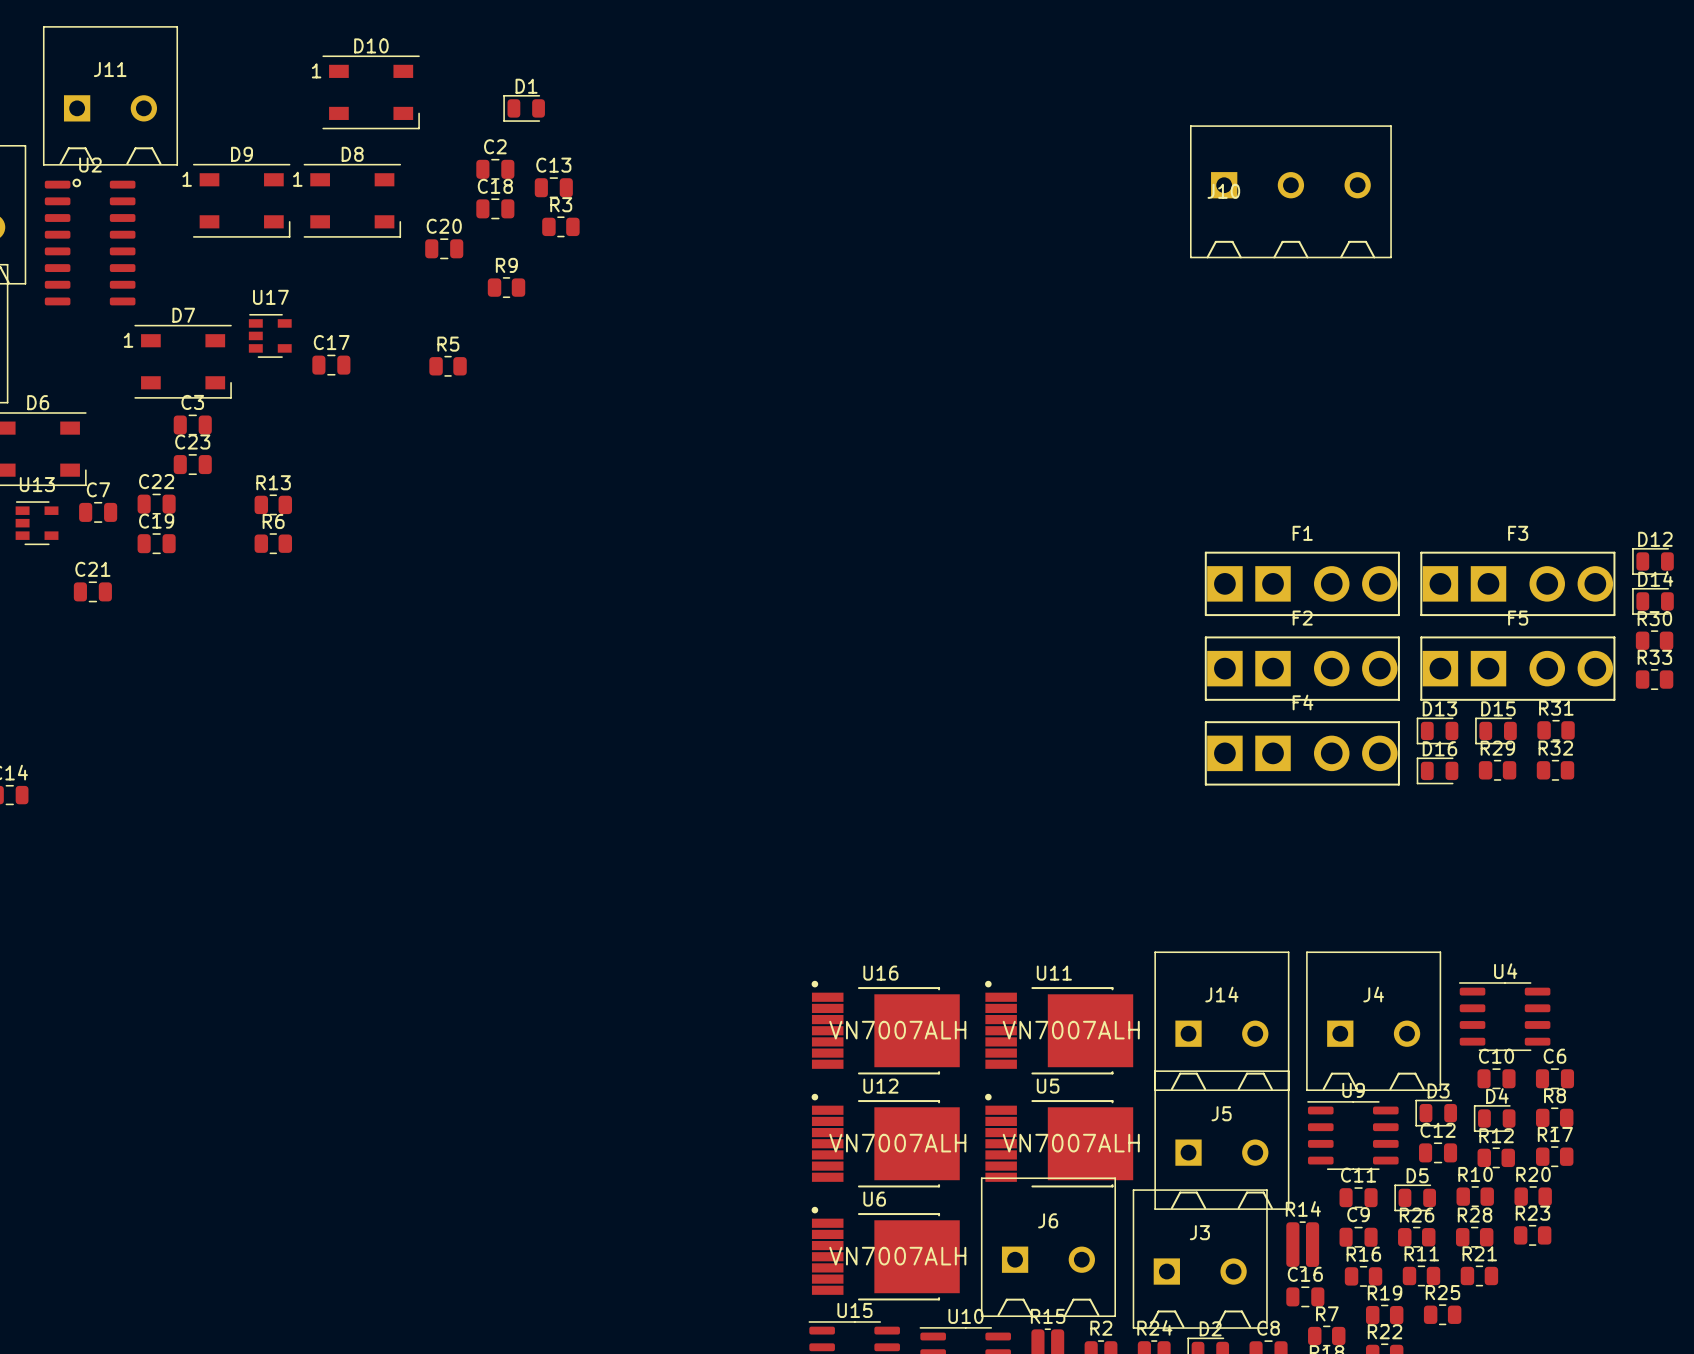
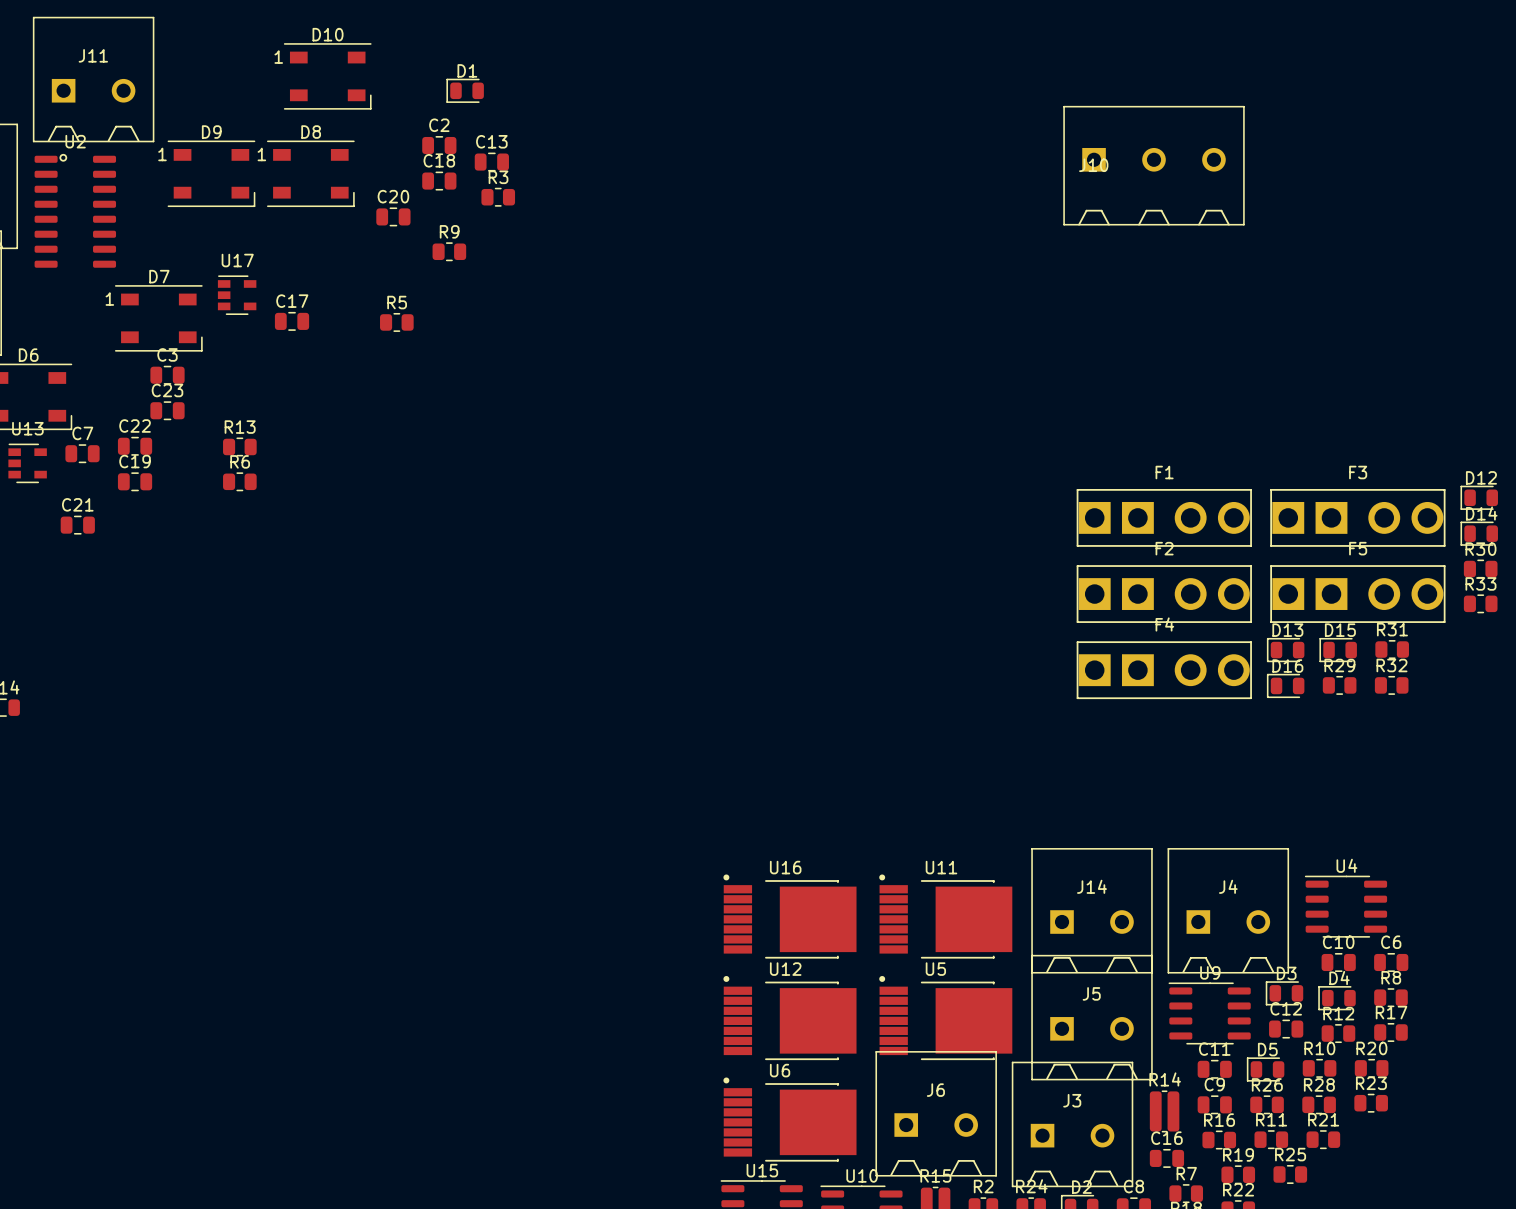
U16 value: VN7007ALH (897, 1030) -> none
U11 value: VN7007ALH (1071, 1030) -> none
U12 value: VN7007ALH (897, 1143) -> none
U5 value: VN7007ALH (1071, 1143) -> none
U6 value: VN7007ALH (897, 1256) -> none

